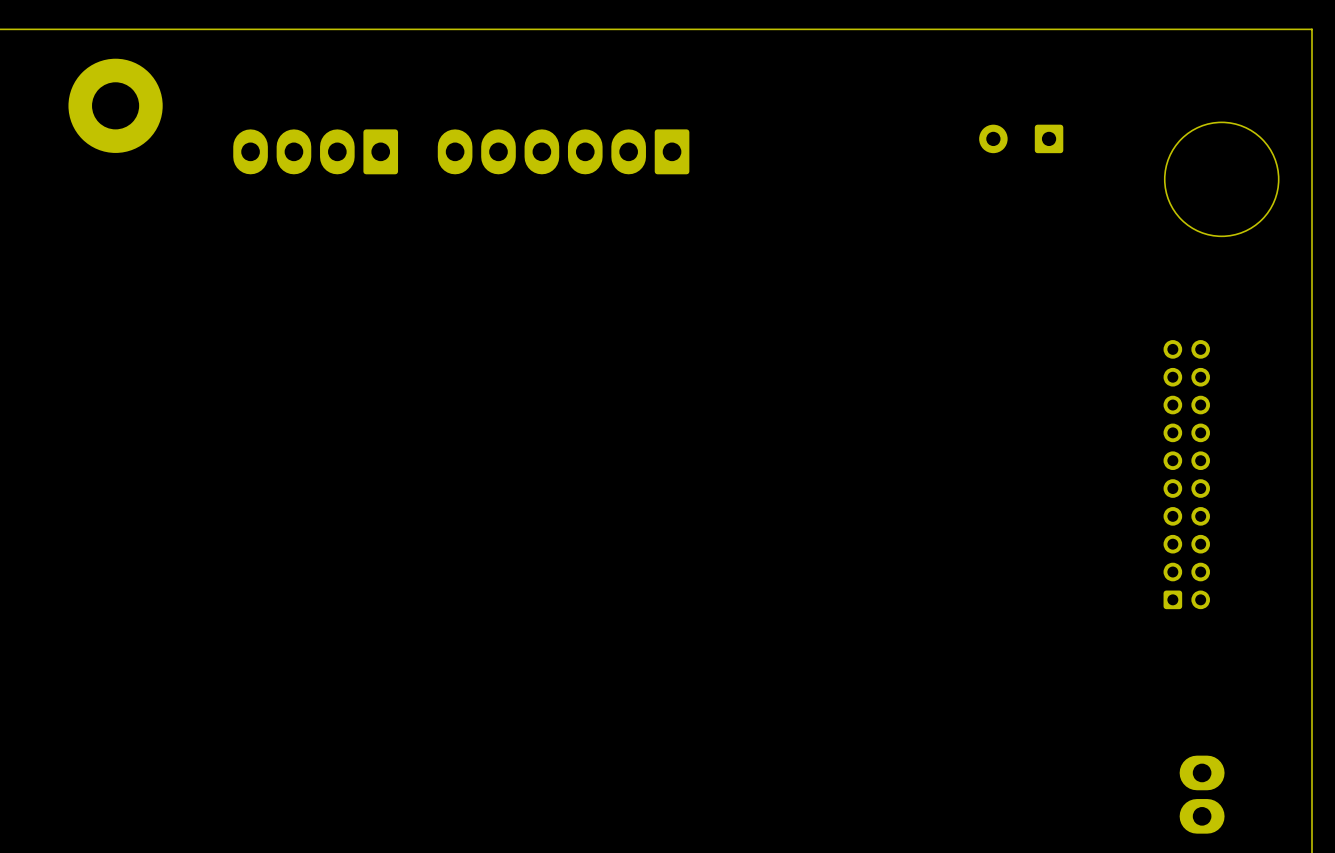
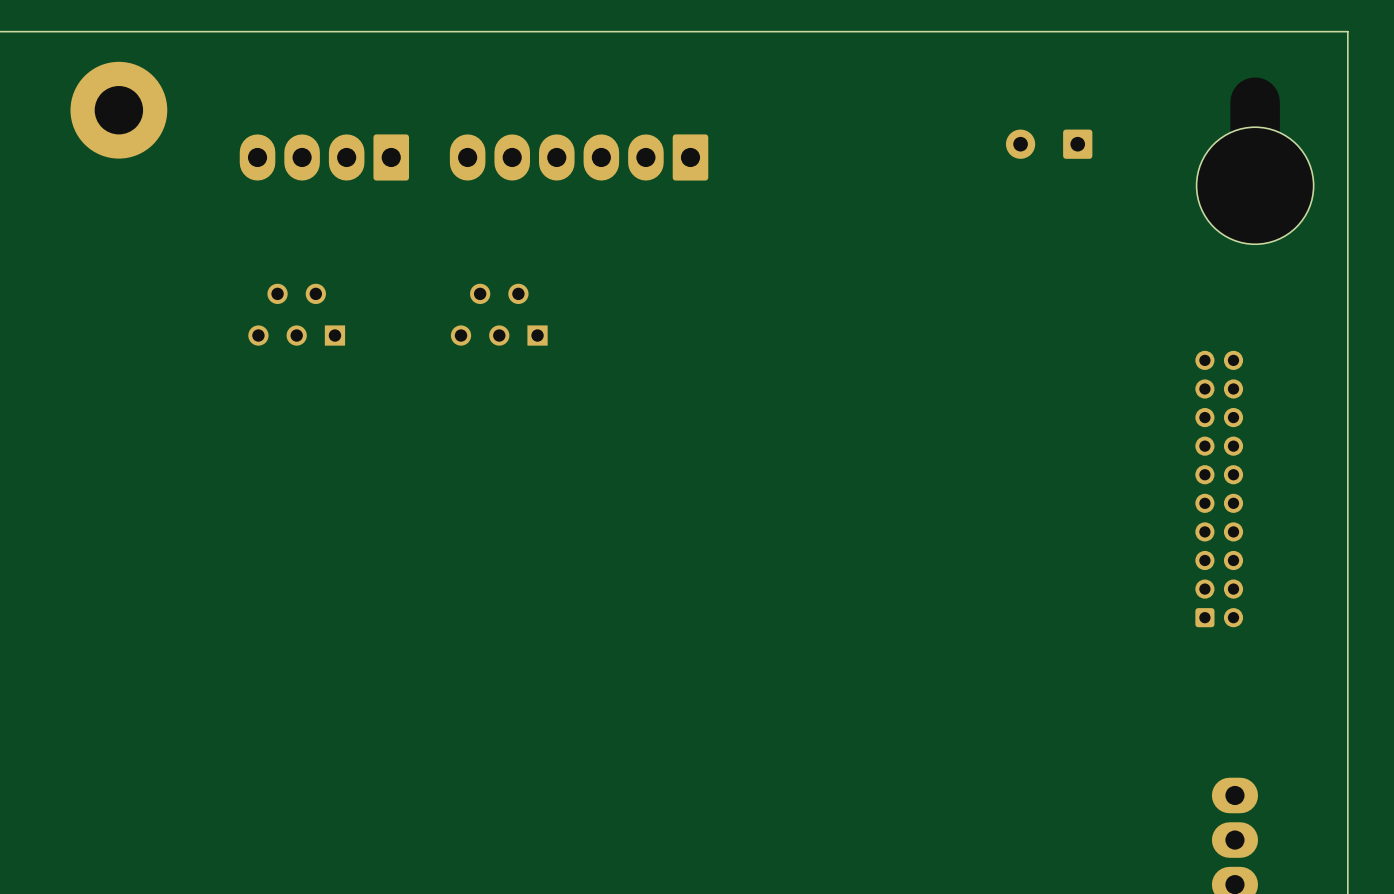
part: none -> (296, 314)
part: none -> (499, 314)

